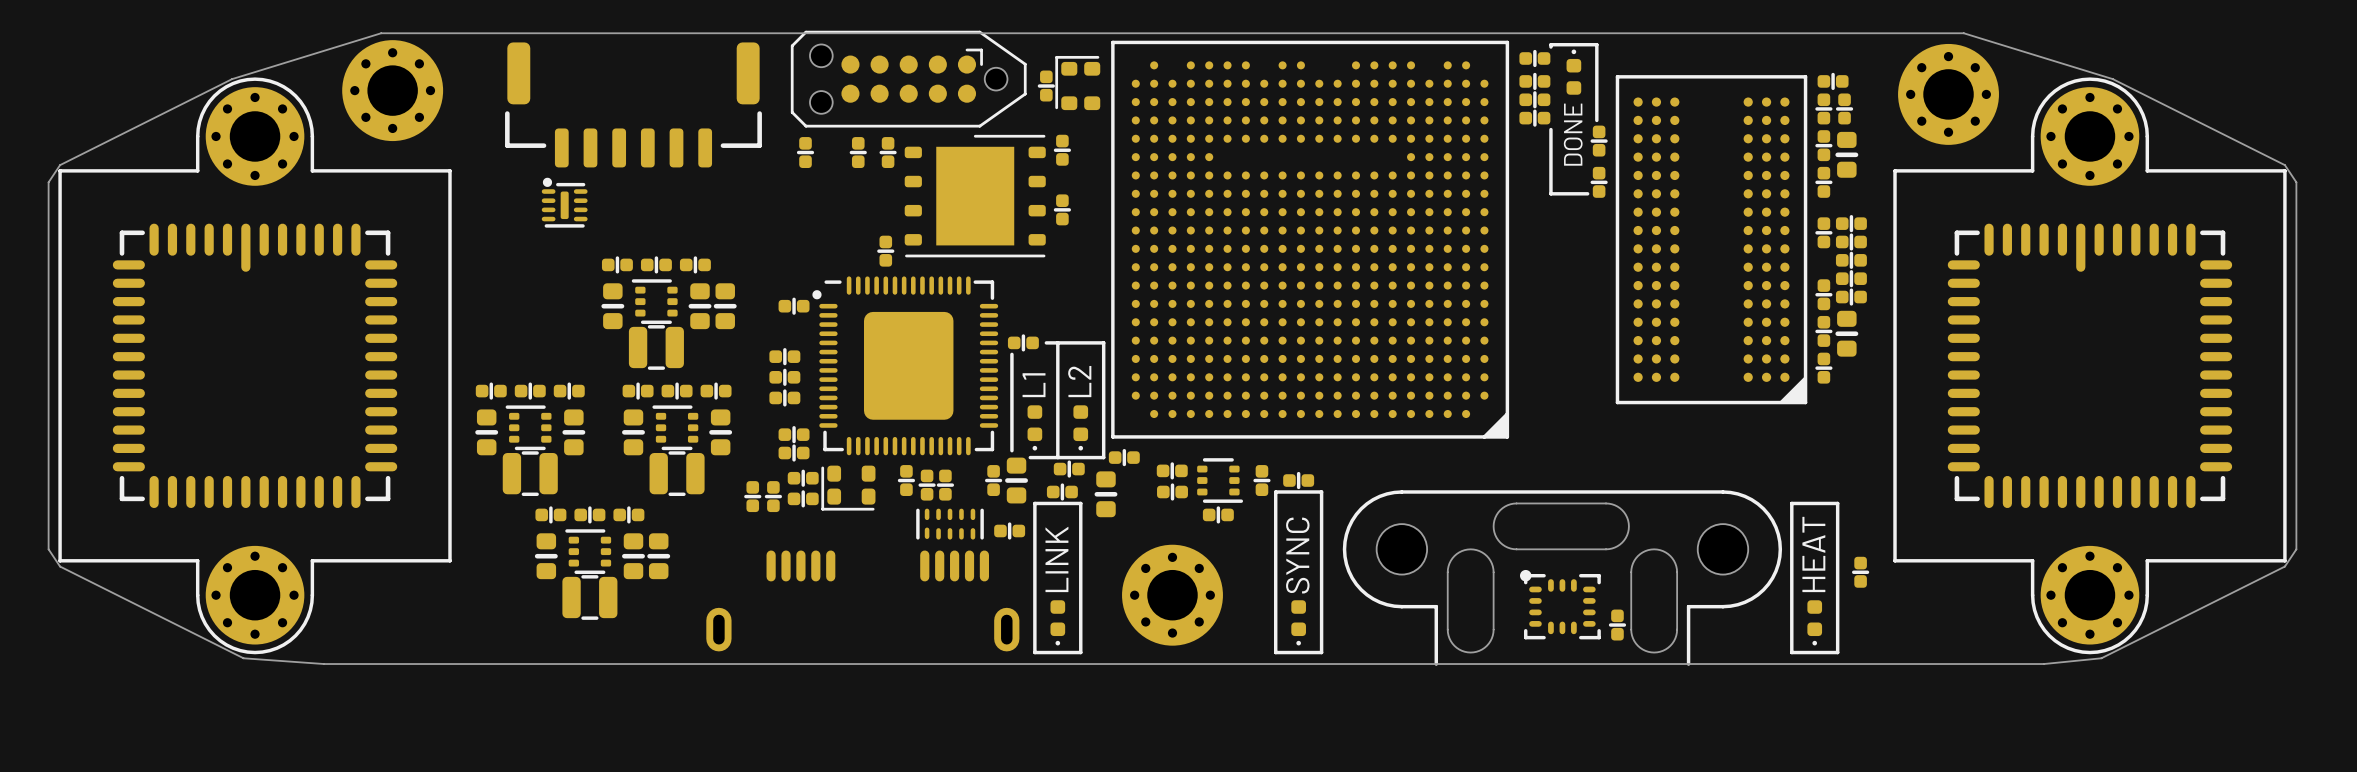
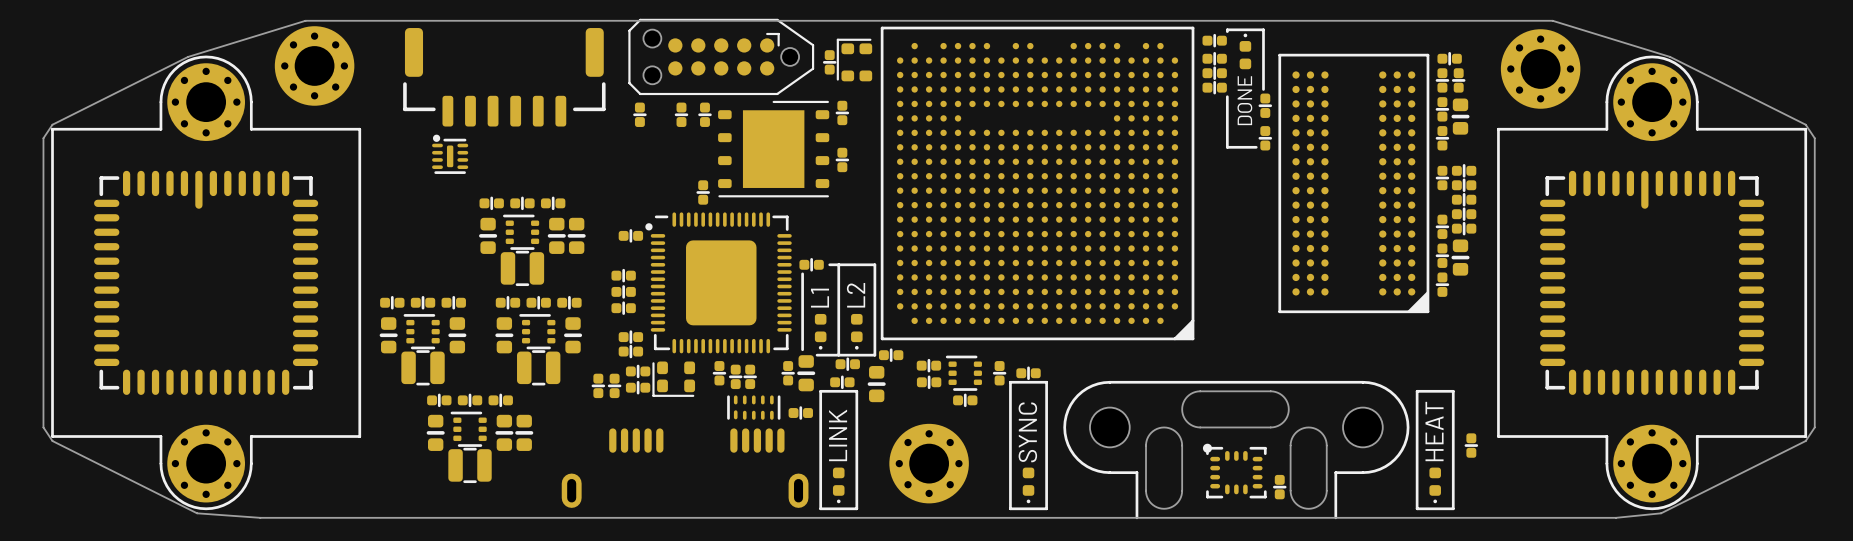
part rotation: 0° (1220, 480) -> 180° (963, 373)

